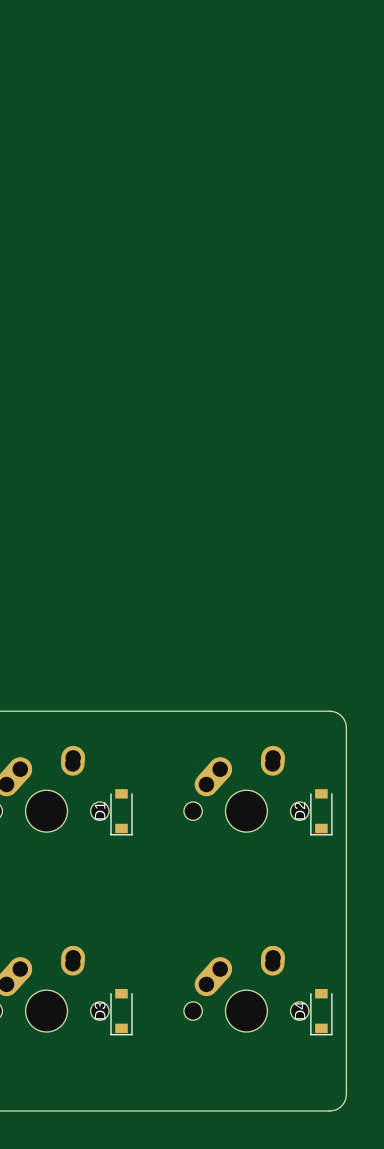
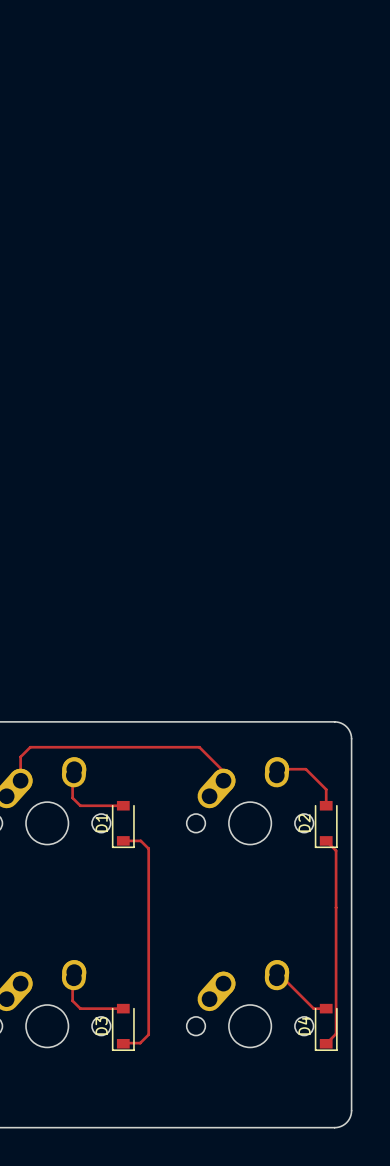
track: none -> (277, 769) (305, 769) (326, 789) (326, 805)
track: none -> (73, 775) (72, 797) (80, 805) (123, 805)
track: none -> (20, 780) (20, 756) (30, 747) (199, 747) (223, 771) (223, 780)
track: none -> (123, 840) (140, 840) (148, 848)
track: none -> (326, 840) (336, 850) (336, 1033) (326, 1043)
track: none -> (148, 848) (148, 1034) (140, 1043) (123, 1043)
track: none -> (277, 972) (313, 1008) (326, 1008)
track: none -> (73, 978) (72, 1000) (80, 1008) (123, 1008)

